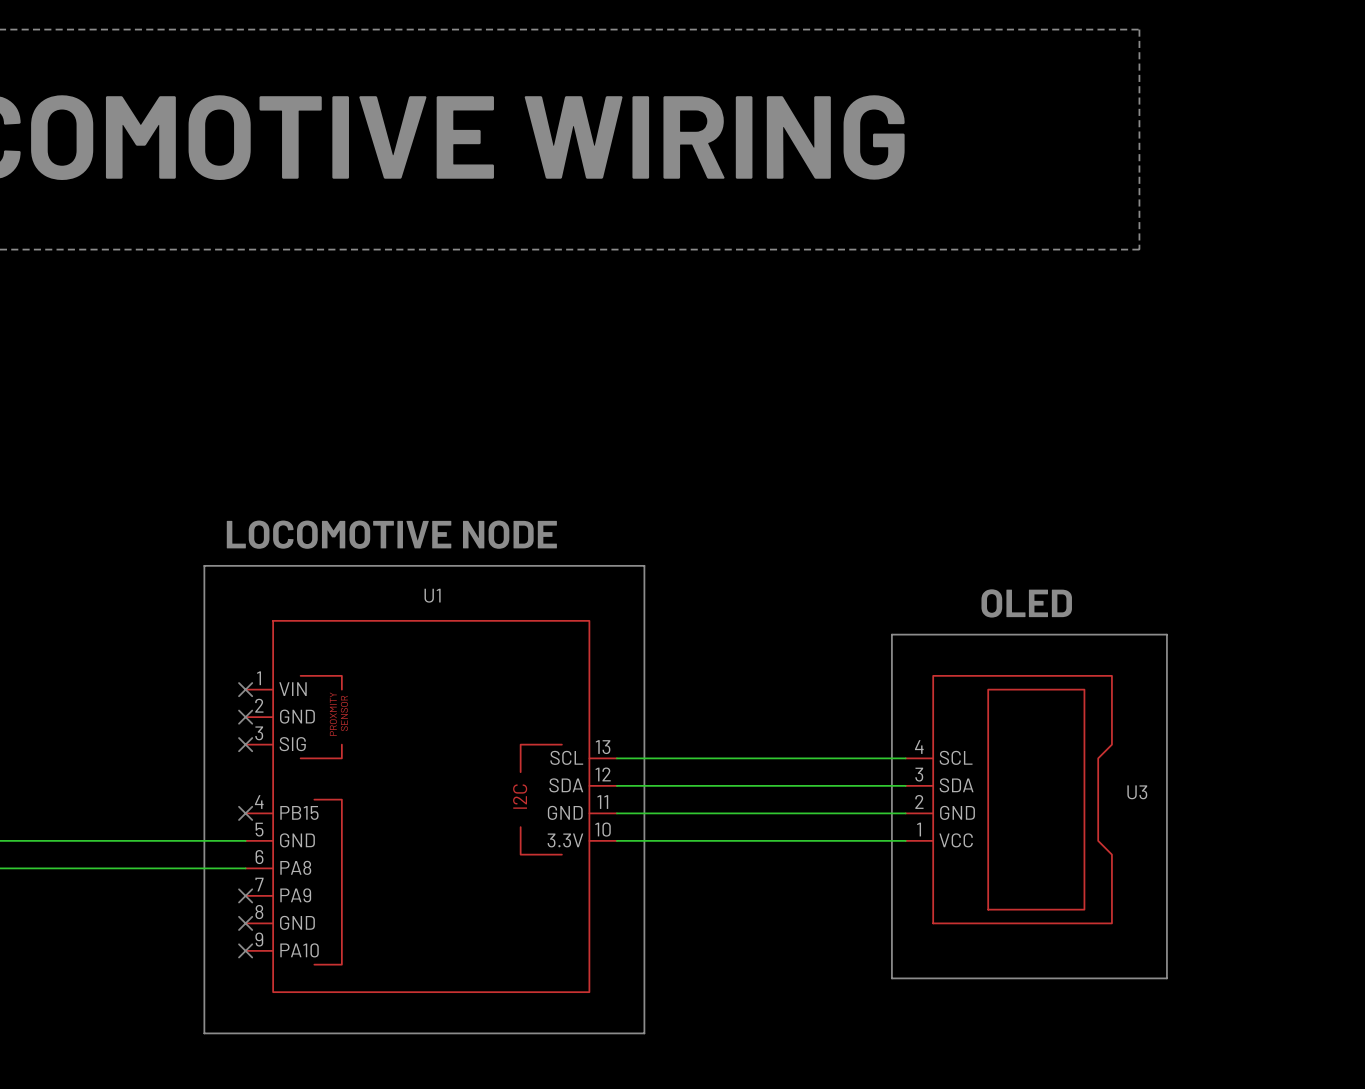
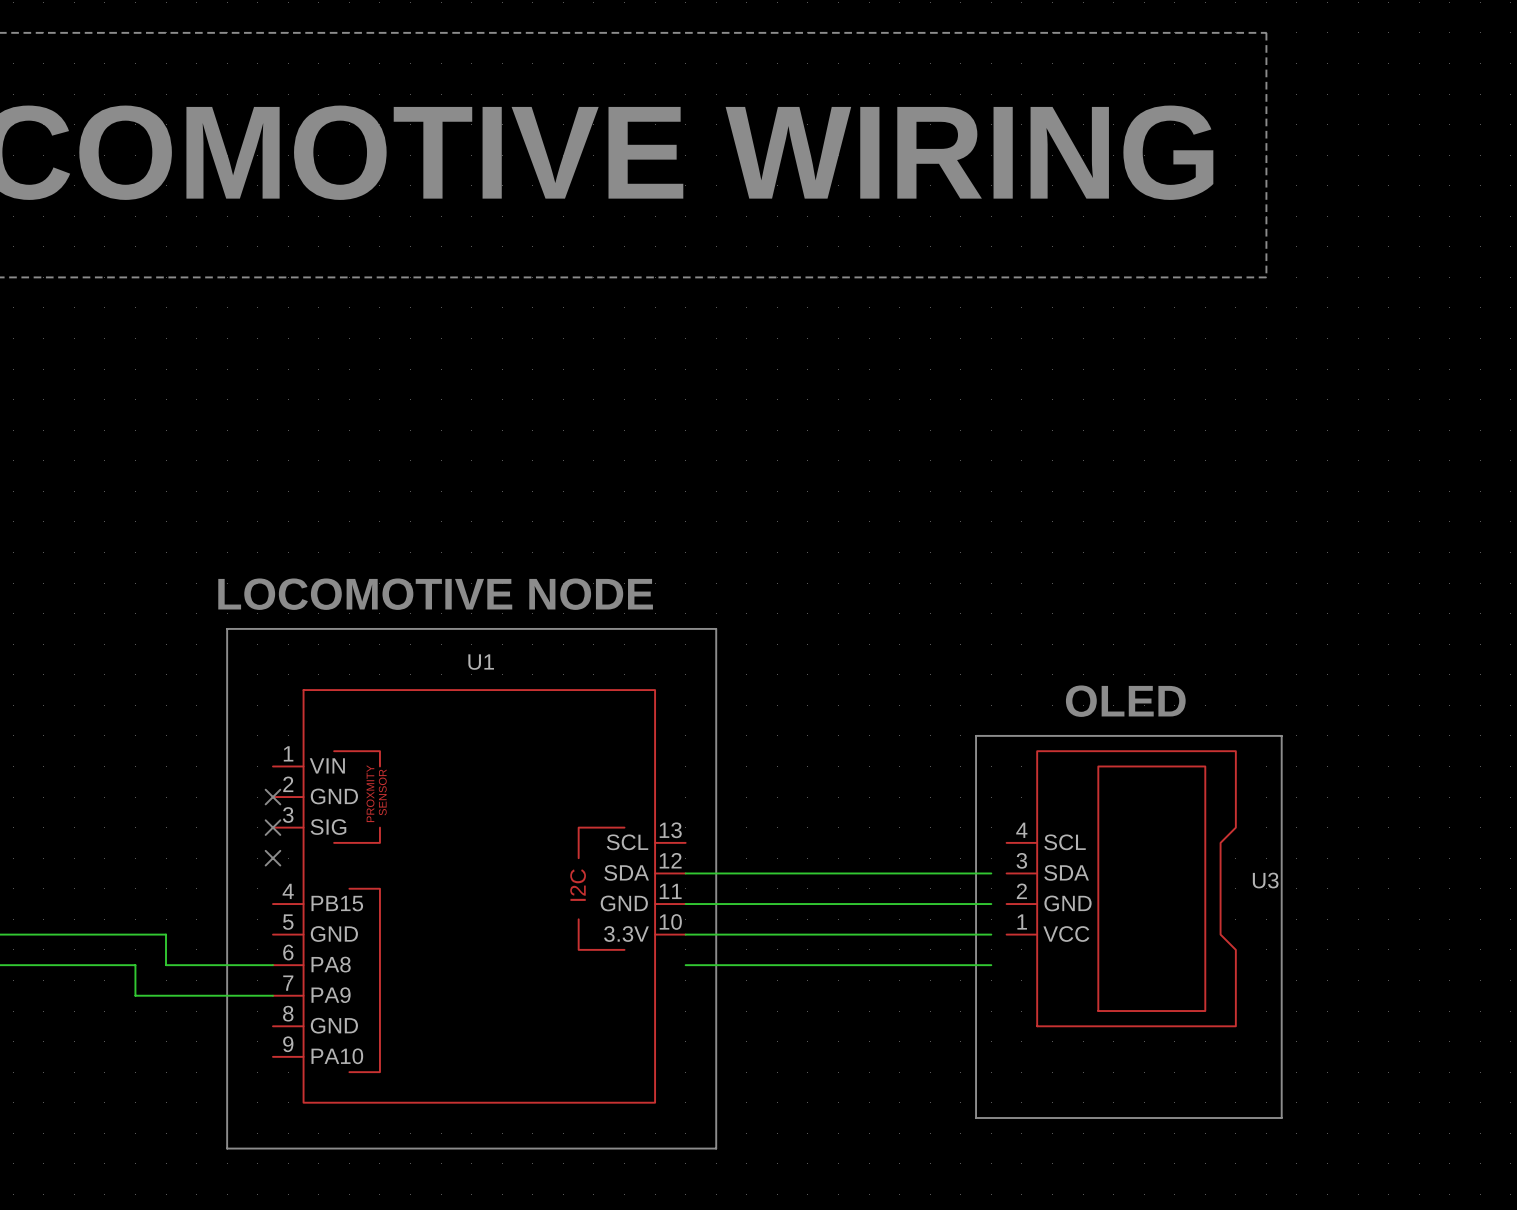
text position: OLED (1026, 603) -> OLED (1125, 701)
line: (891, 634) (1166, 634) (1166, 978) (891, 978) (891, 634) -> (976, 735) (1281, 735) (1281, 1118) (976, 1118) (976, 735)
no-connect mark: (245, 689) -> none
wire: (616, 758) (905, 758) -> none
no-connect mark: none -> (272, 858)
wire: (891, 785) (905, 785) -> none
no-connect mark: (245, 813) -> none
wire: (891, 813) (905, 813) -> none
wire: (149, 840) (245, 840) -> none
wire: (891, 840) (905, 840) -> none
wire: (121, 868) (149, 868) -> (166, 934) (166, 965)
wire: none -> (135, 965) (135, 995) (272, 995)
wire: none -> (685, 965) (991, 965)
no-connect mark: (245, 895) -> none
no-connect mark: (245, 923) -> none
no-connect mark: (245, 950) -> none

